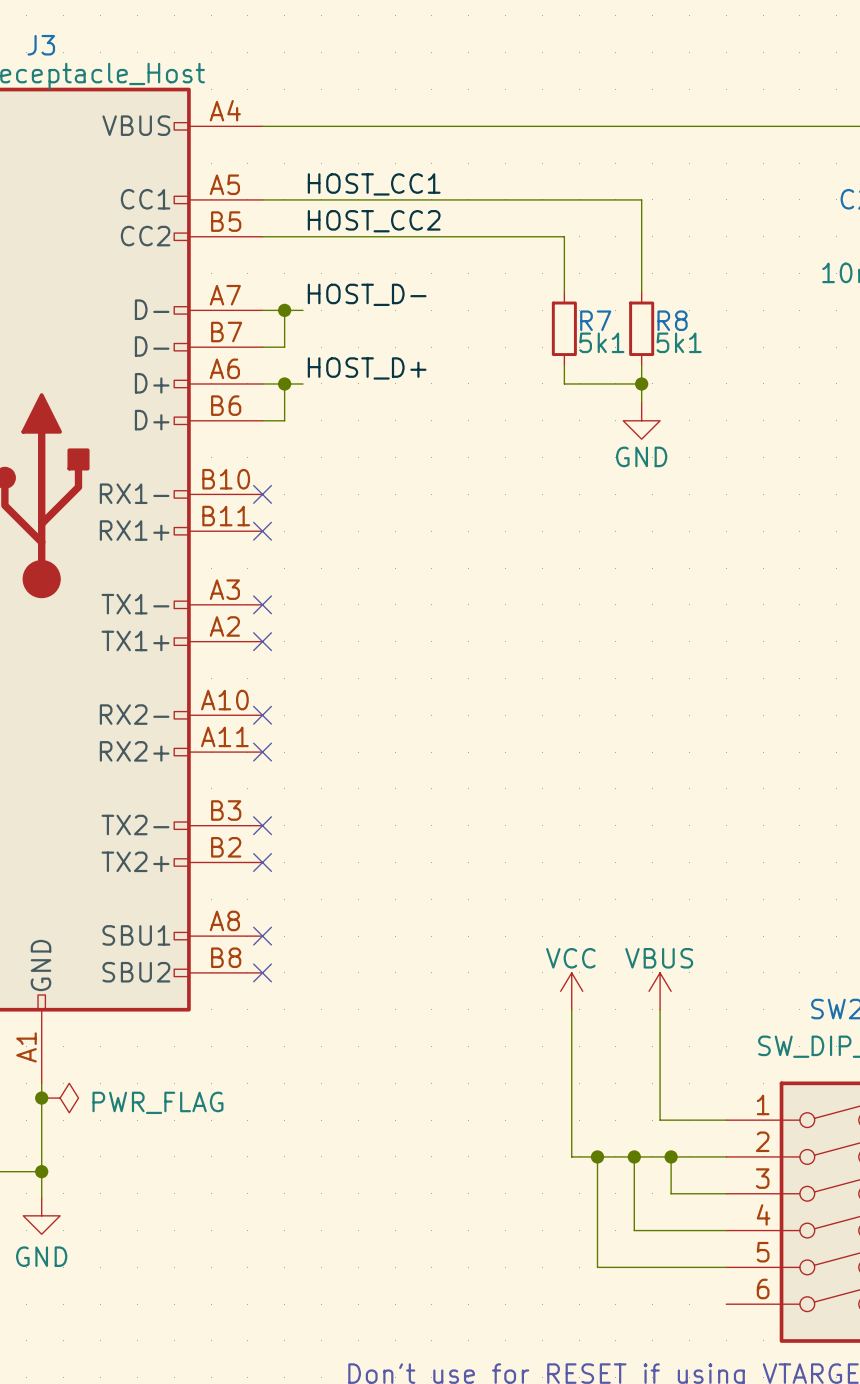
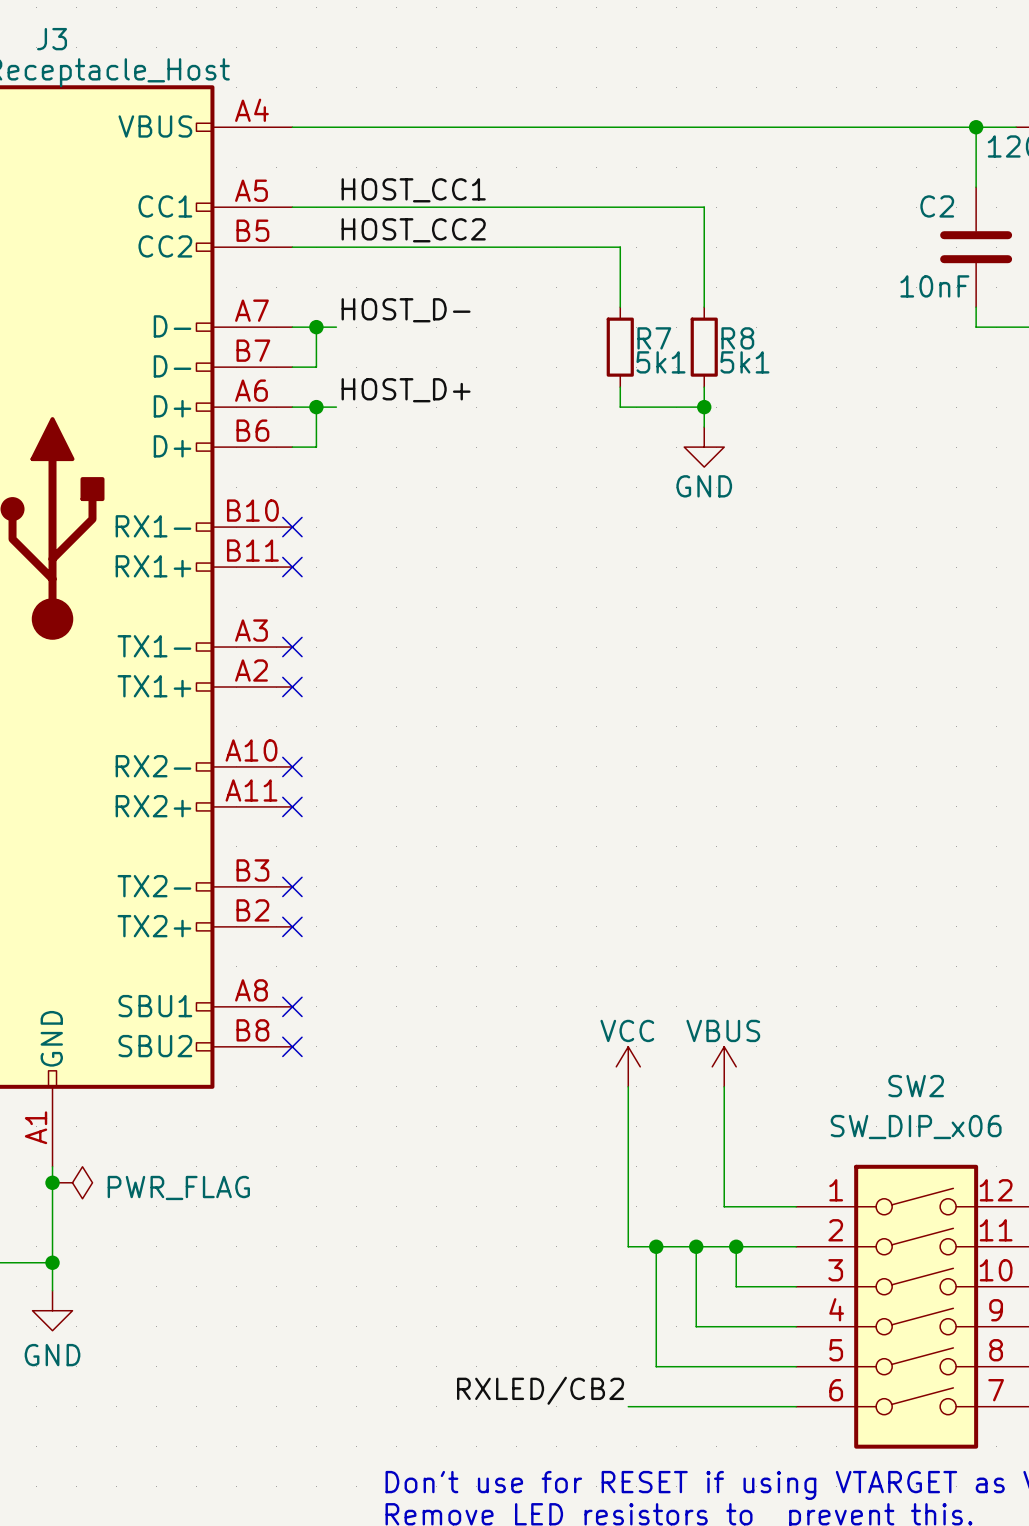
label: none -> RXLED/CB2 (540, 1390)
wire: none -> (628, 1406) (796, 1406)

